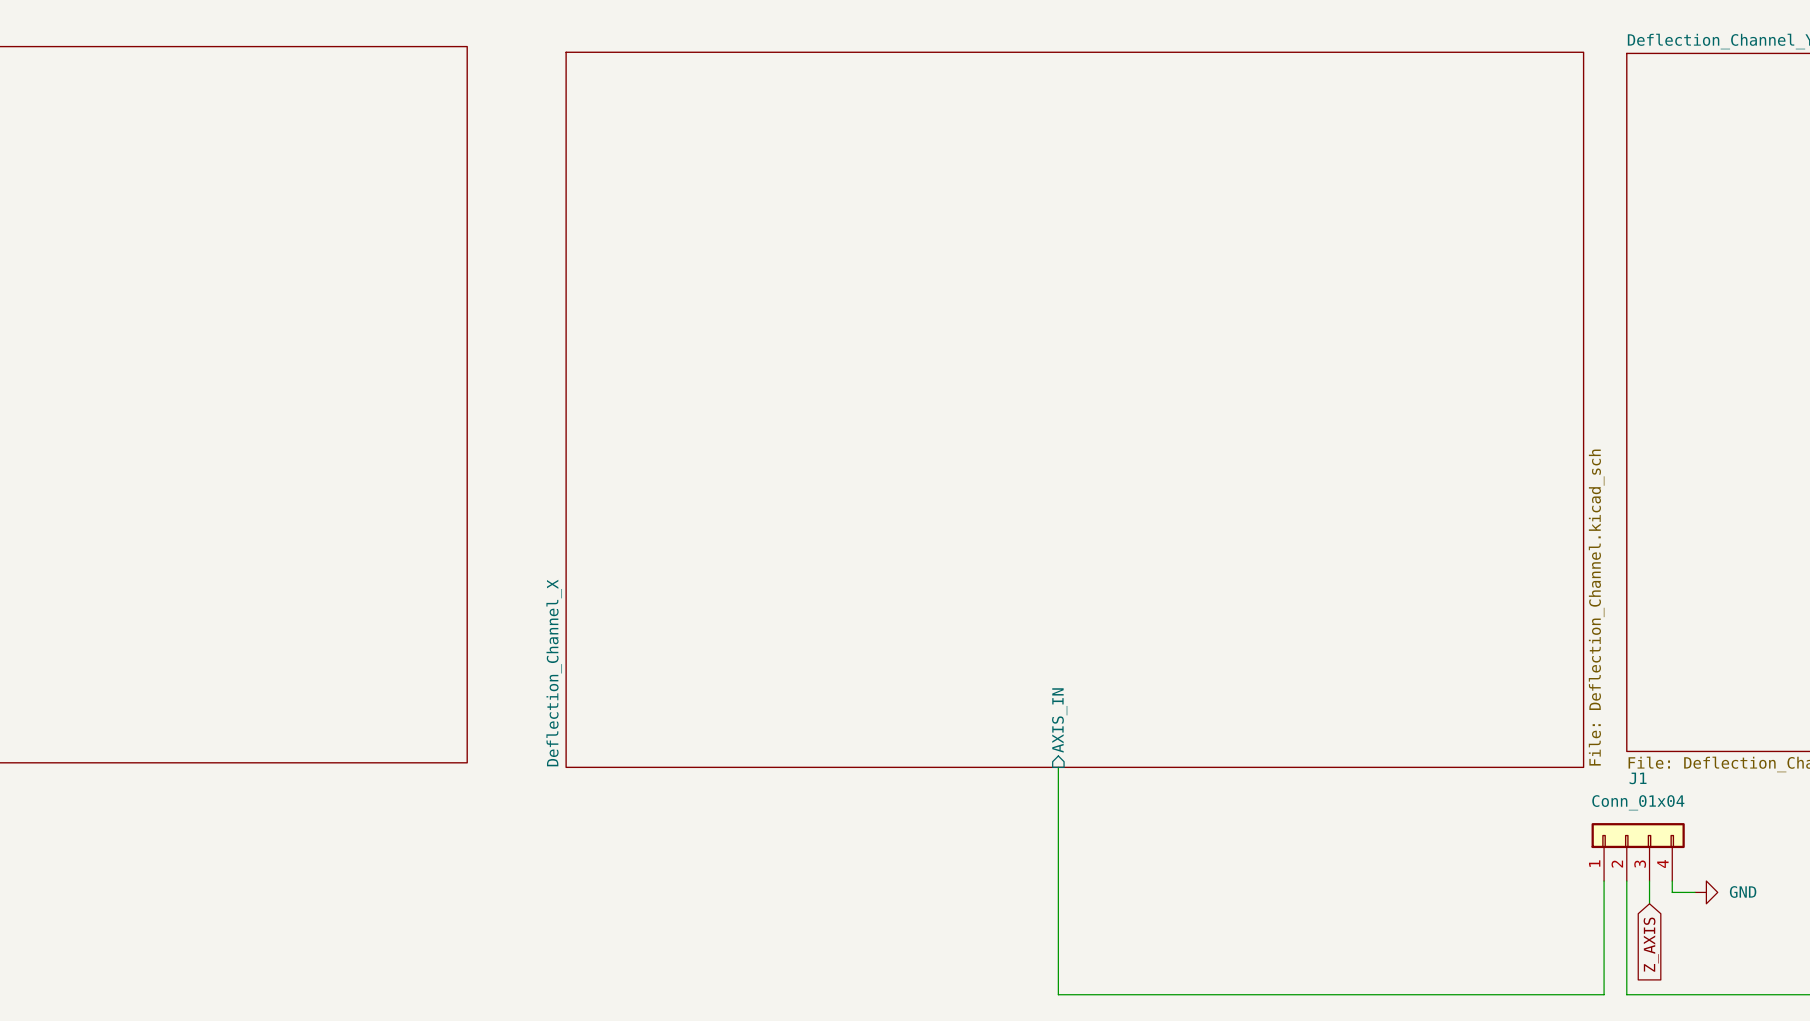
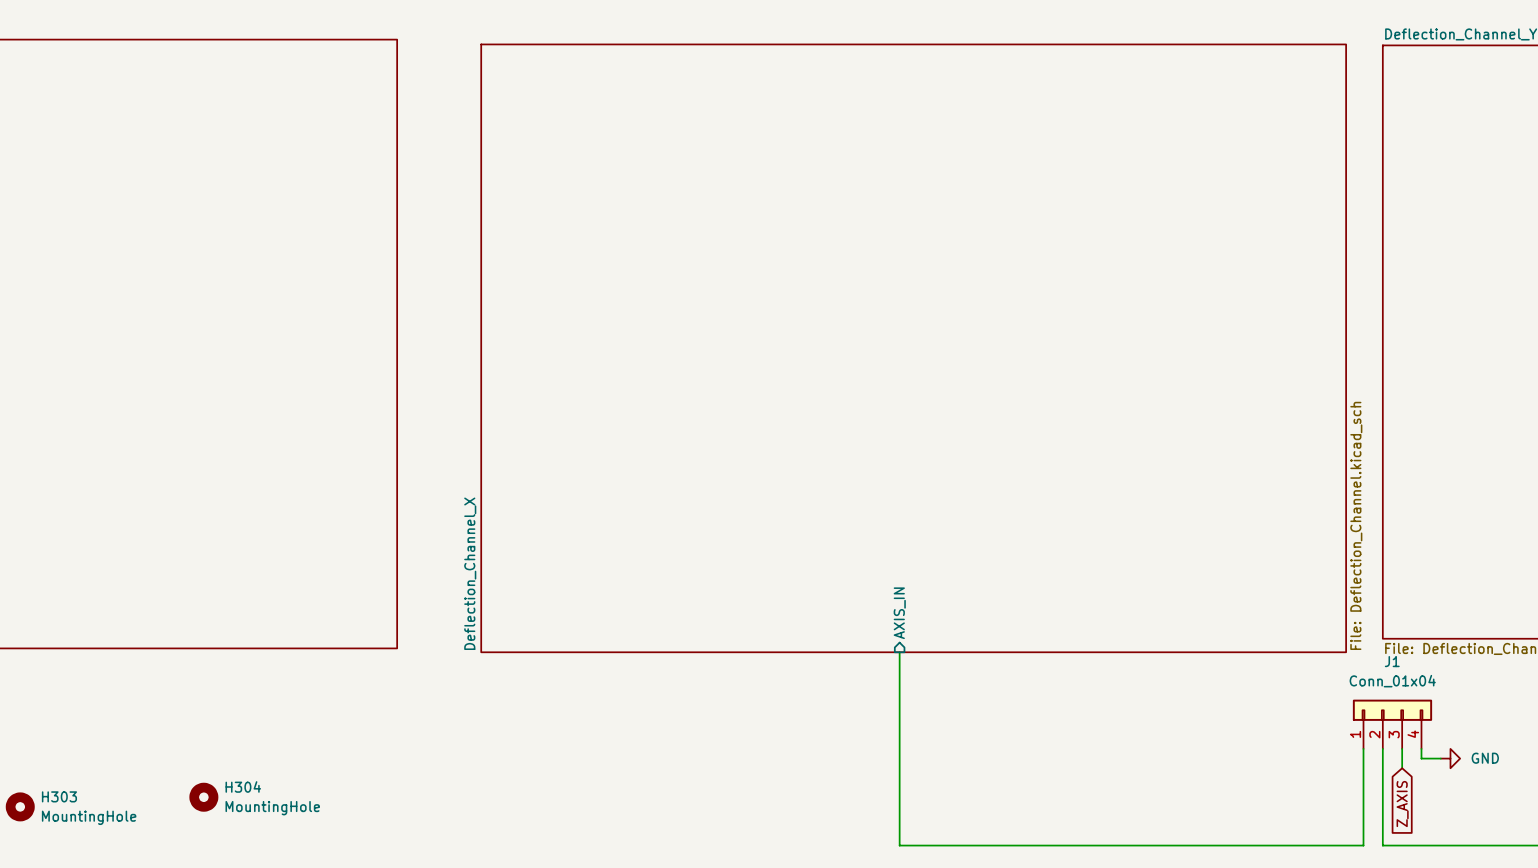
H304: none -> MountingHole (203, 797)
H303: none -> MountingHole (20, 806)

